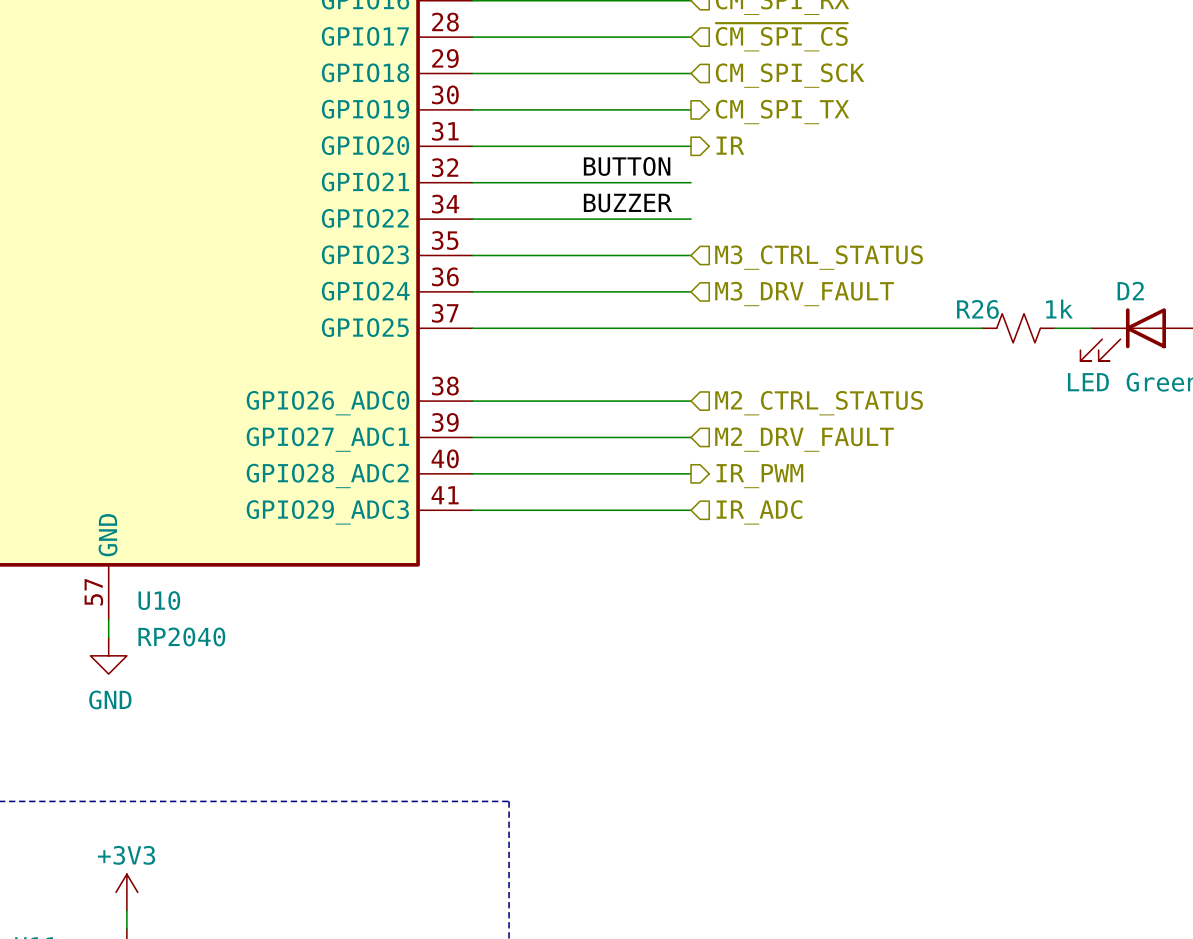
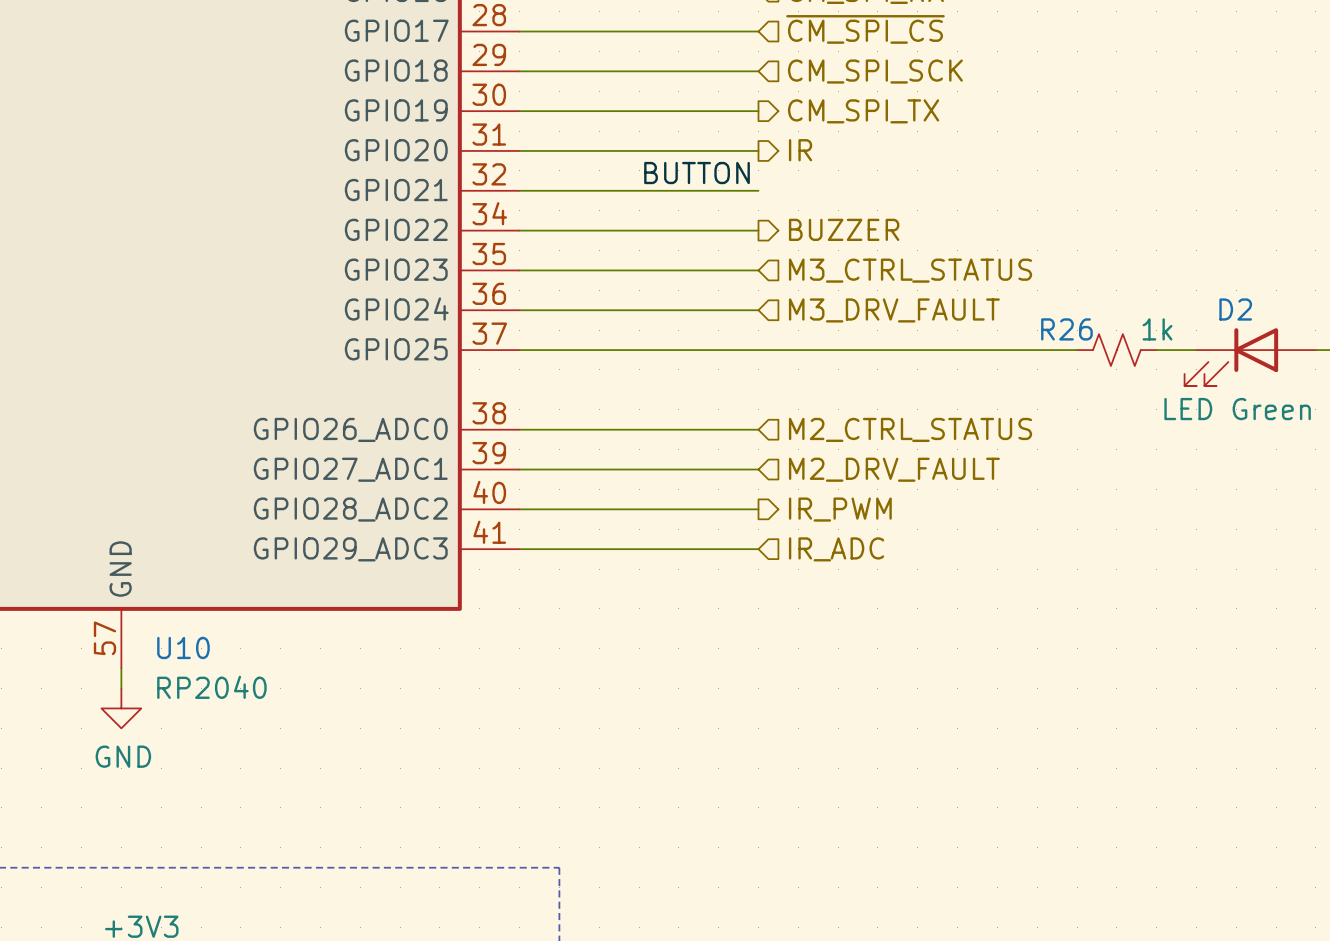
label: BUZZER (627, 203) -> none
hierarchical label: none -> BUZZER (844, 229)

